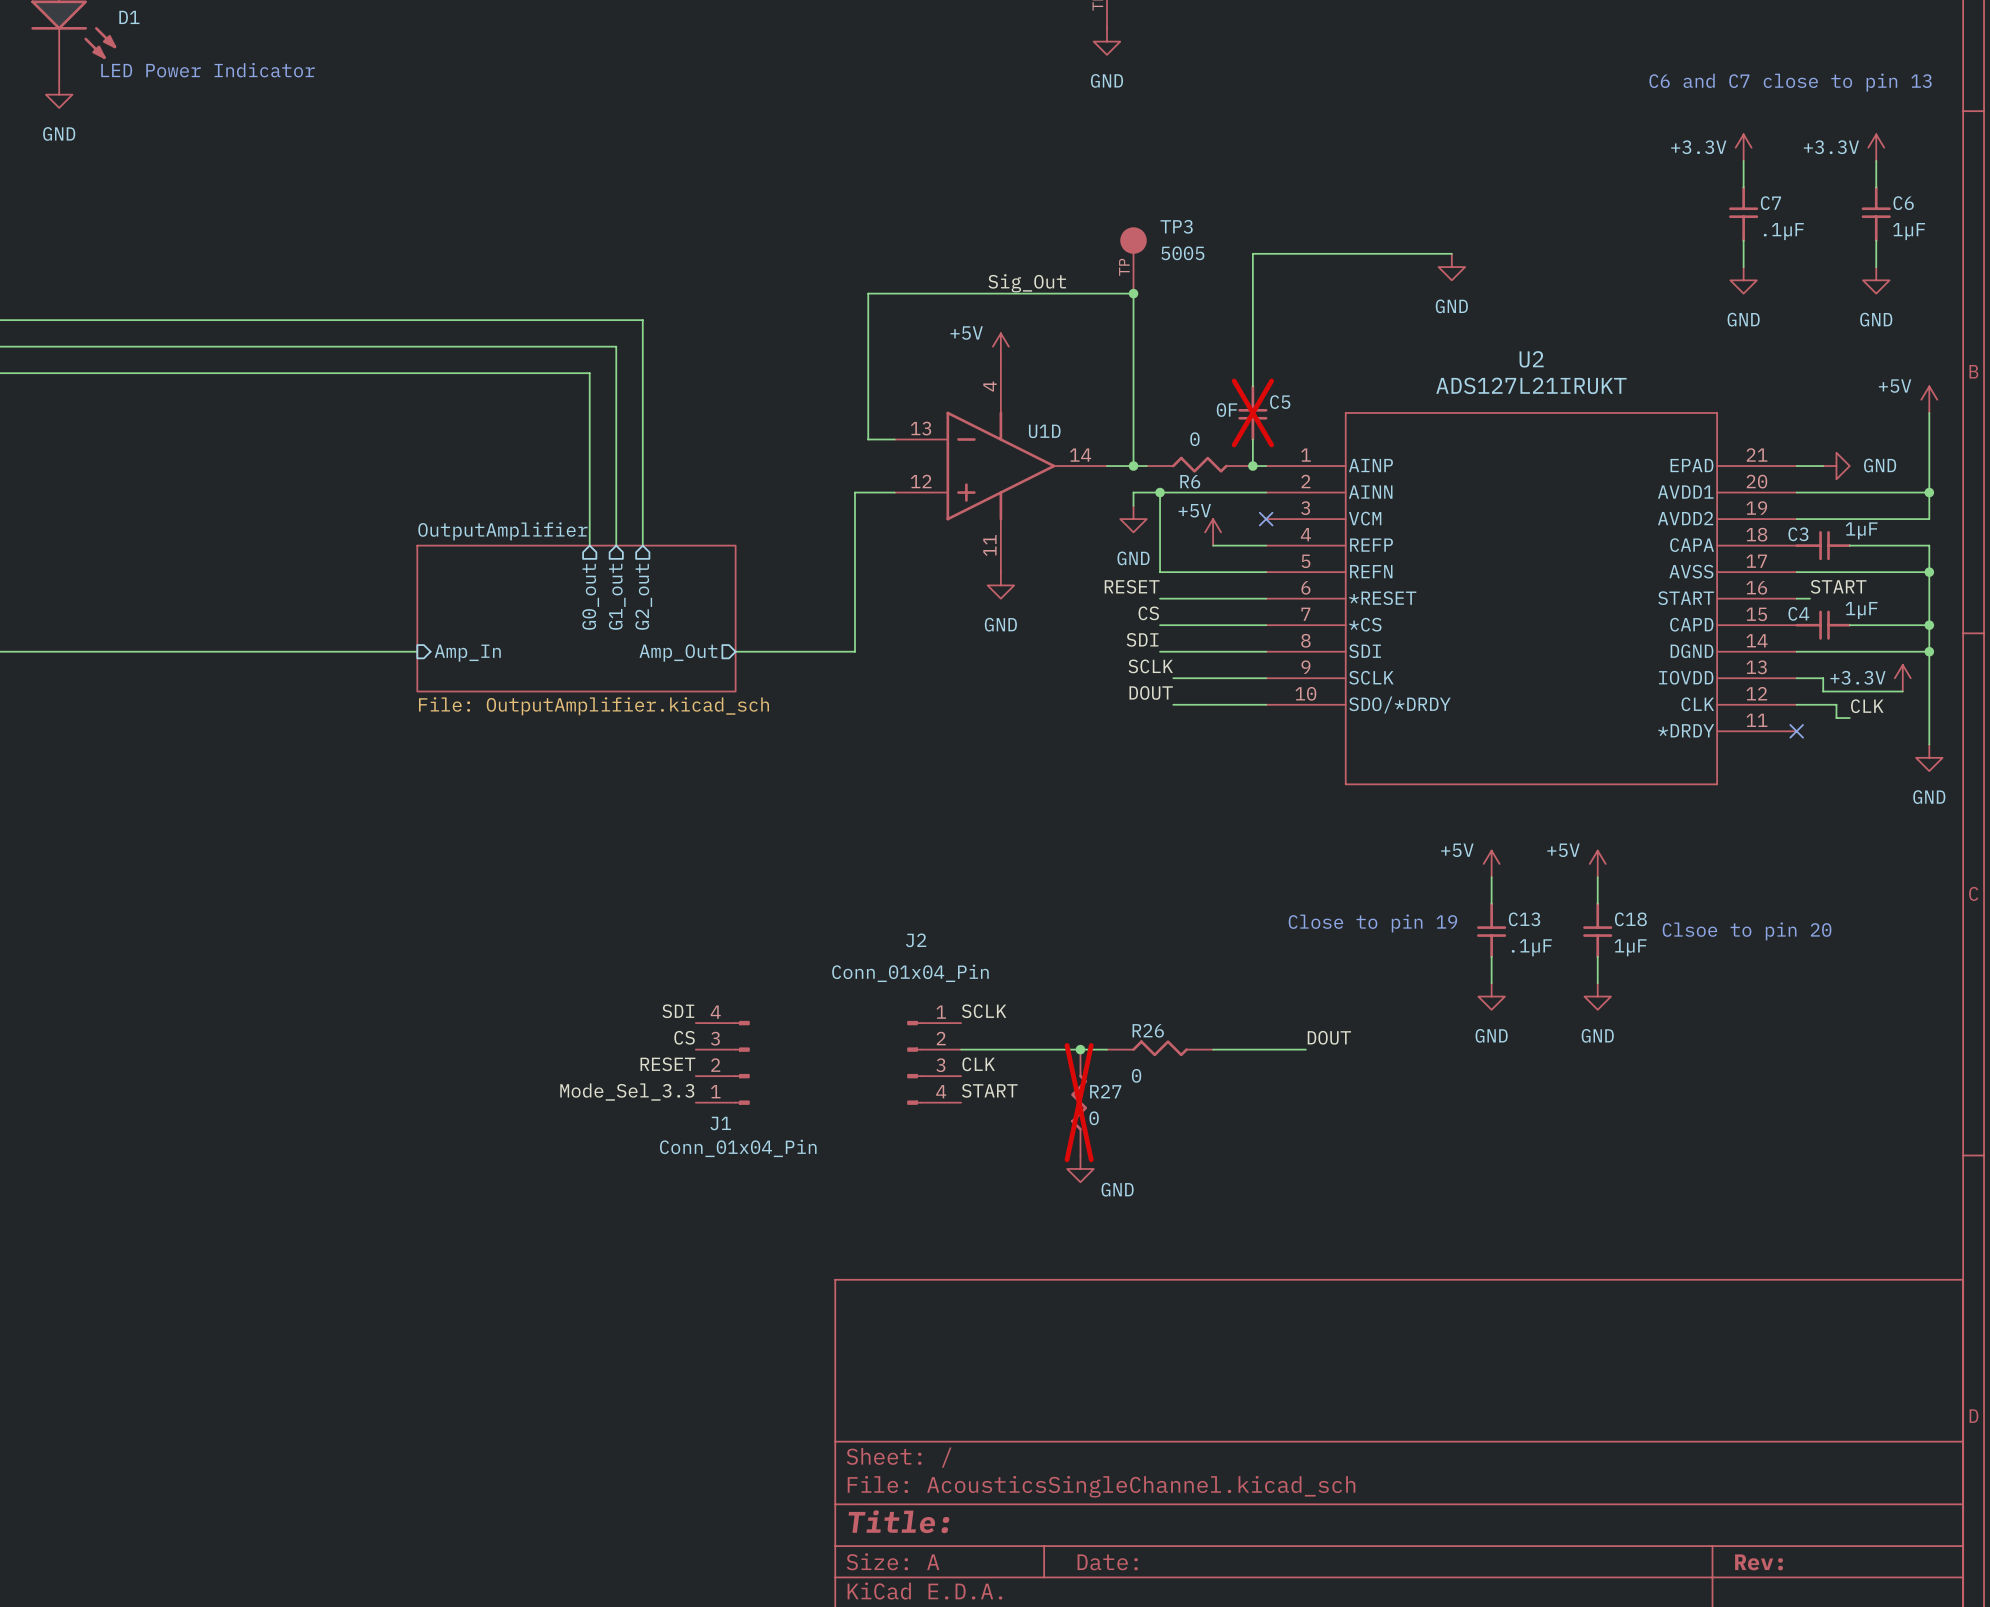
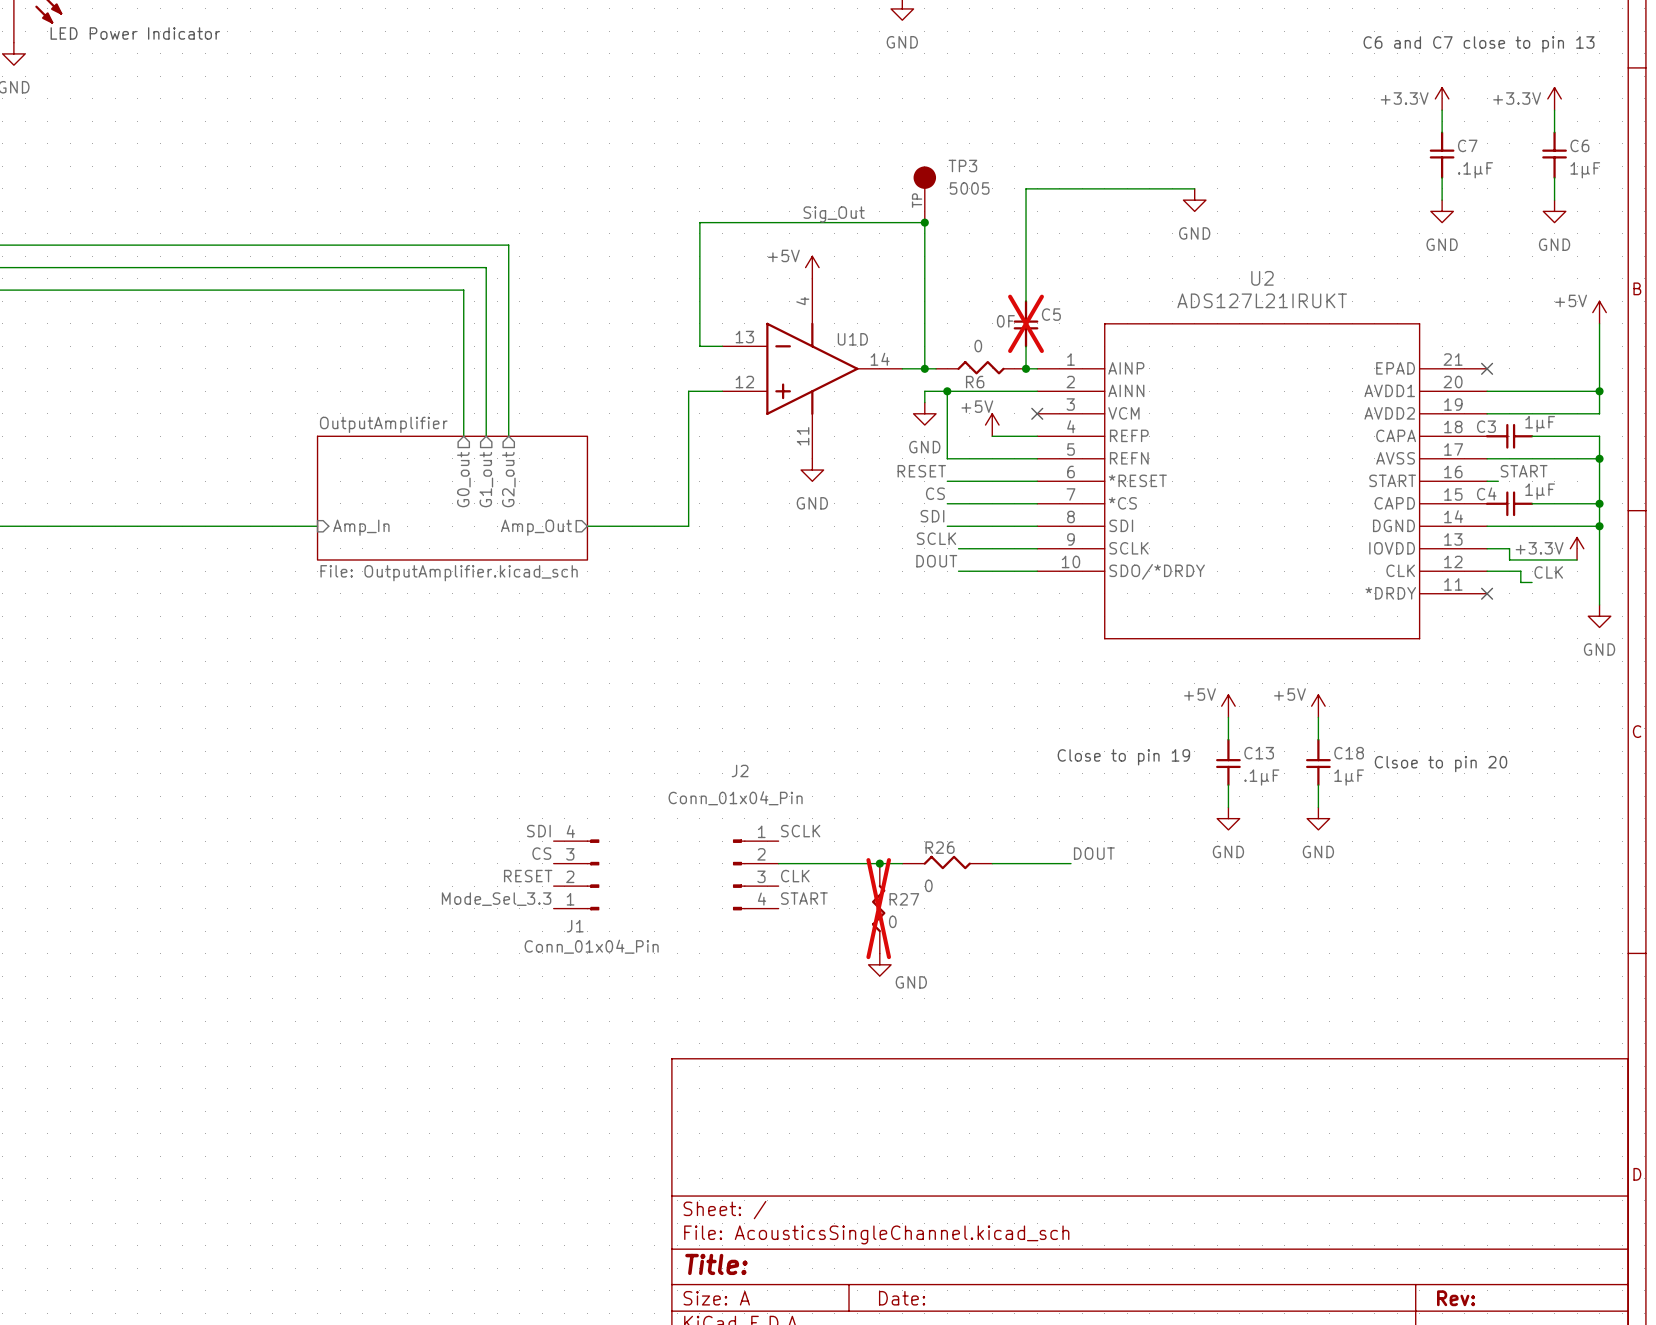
wire: (1796, 466) (1823, 466) -> none
no-connect mark: none -> (1487, 368)
power symbol: GND (1836, 466) -> none

